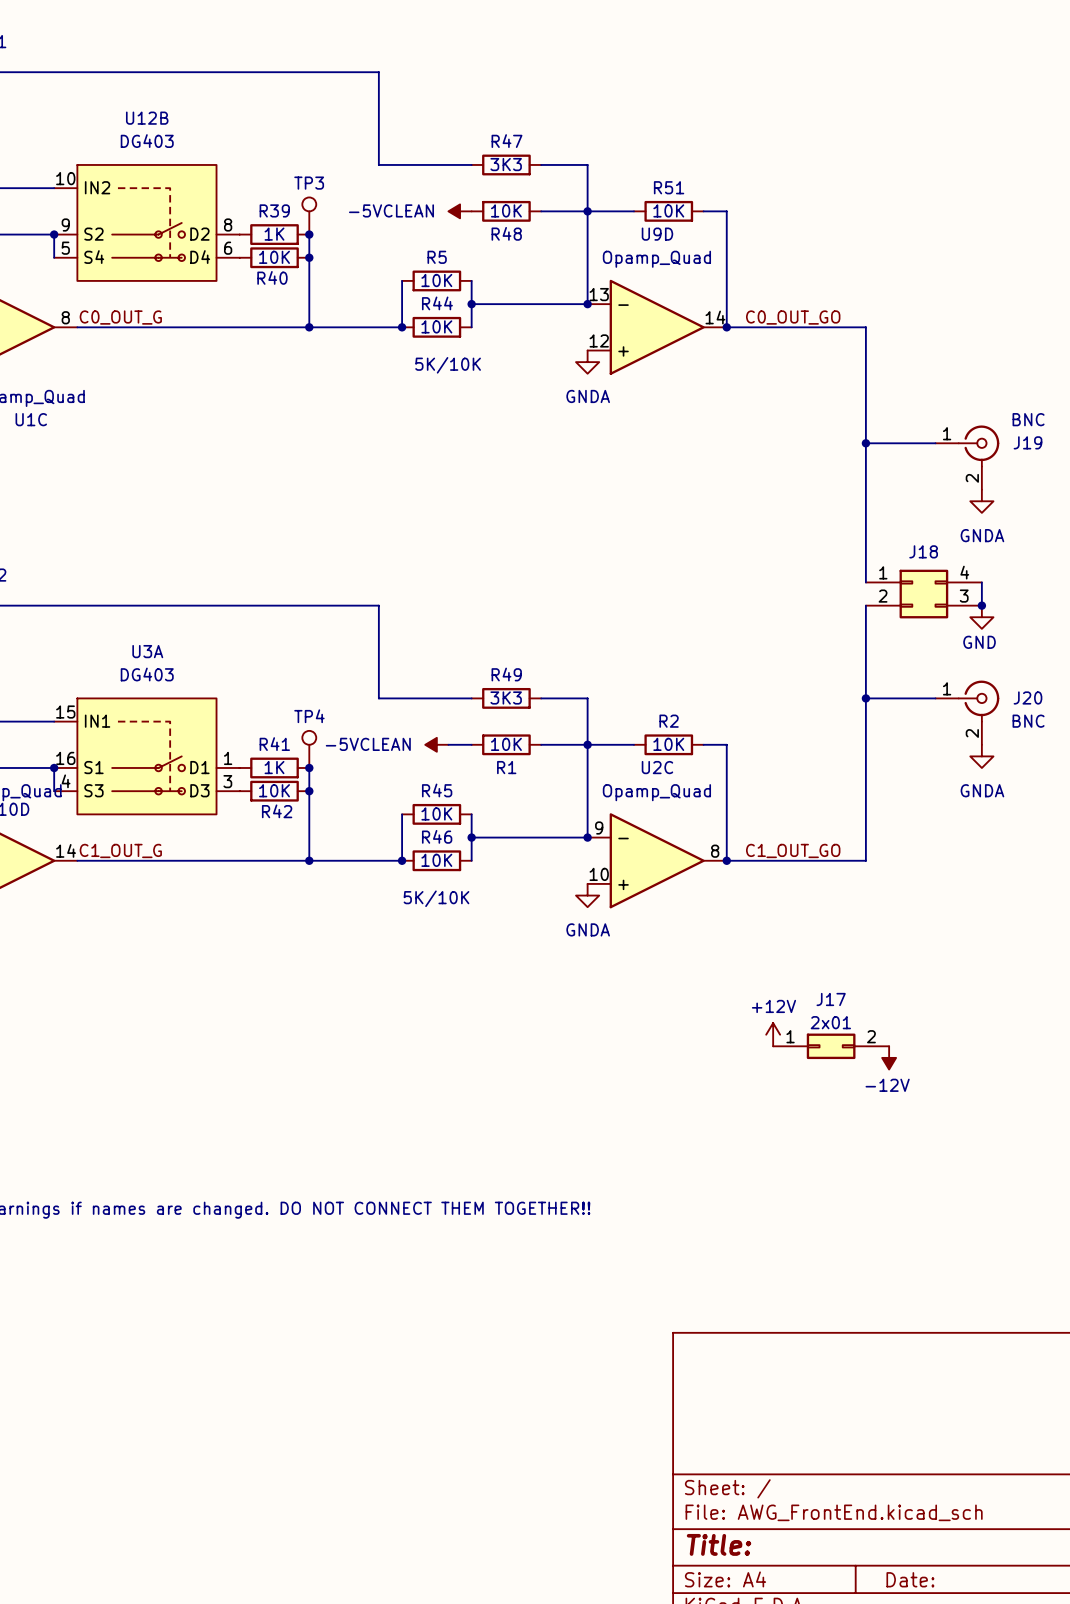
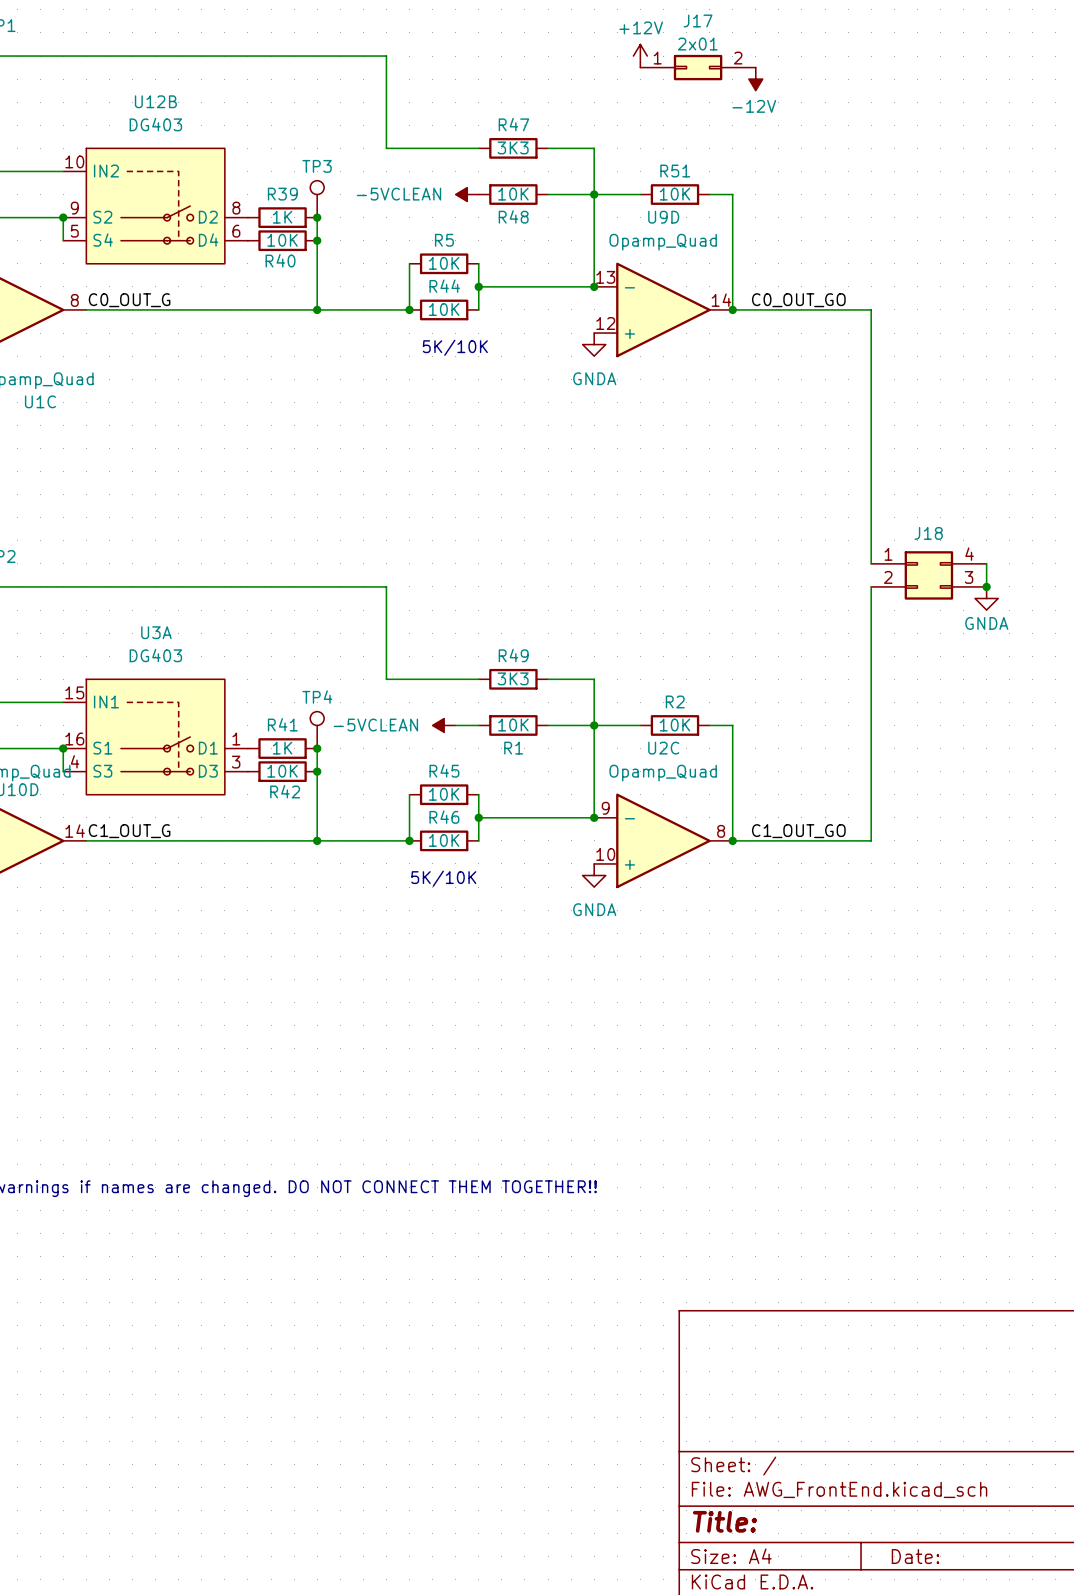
power symbol: none -> +12V (640, 56)
power symbol: none -> -12V (755, 79)
wire: (865, 443) (935, 443) -> none
junction: (865, 443) -> none
J19: BNC (967, 457) -> none
power symbol: GNDA (981, 501) -> none
power symbol: GND (981, 617) -> GNDA (986, 598)
wire: (865, 698) (935, 698) -> none
junction: (865, 698) -> none
J20: BNC (967, 712) -> none
power symbol: GNDA (981, 756) -> none
power symbol: +12V (773, 1034) -> none
J17 position: (831, 1046) -> (698, 67)
power symbol: -12V (889, 1057) -> none

